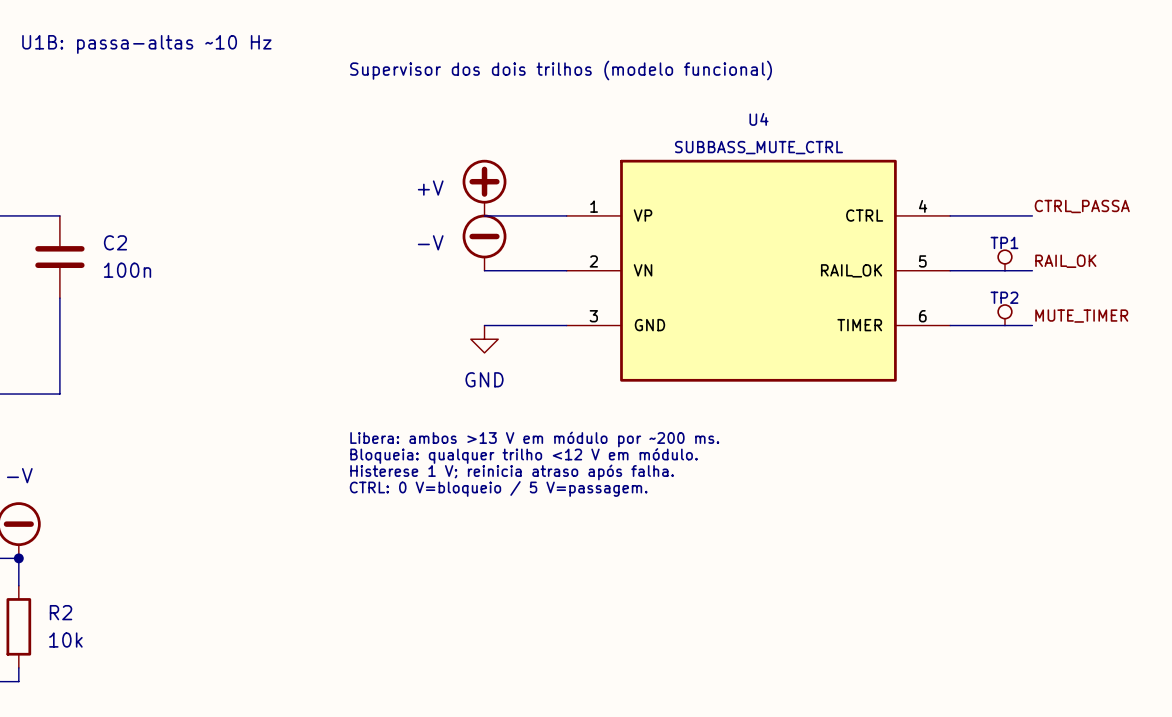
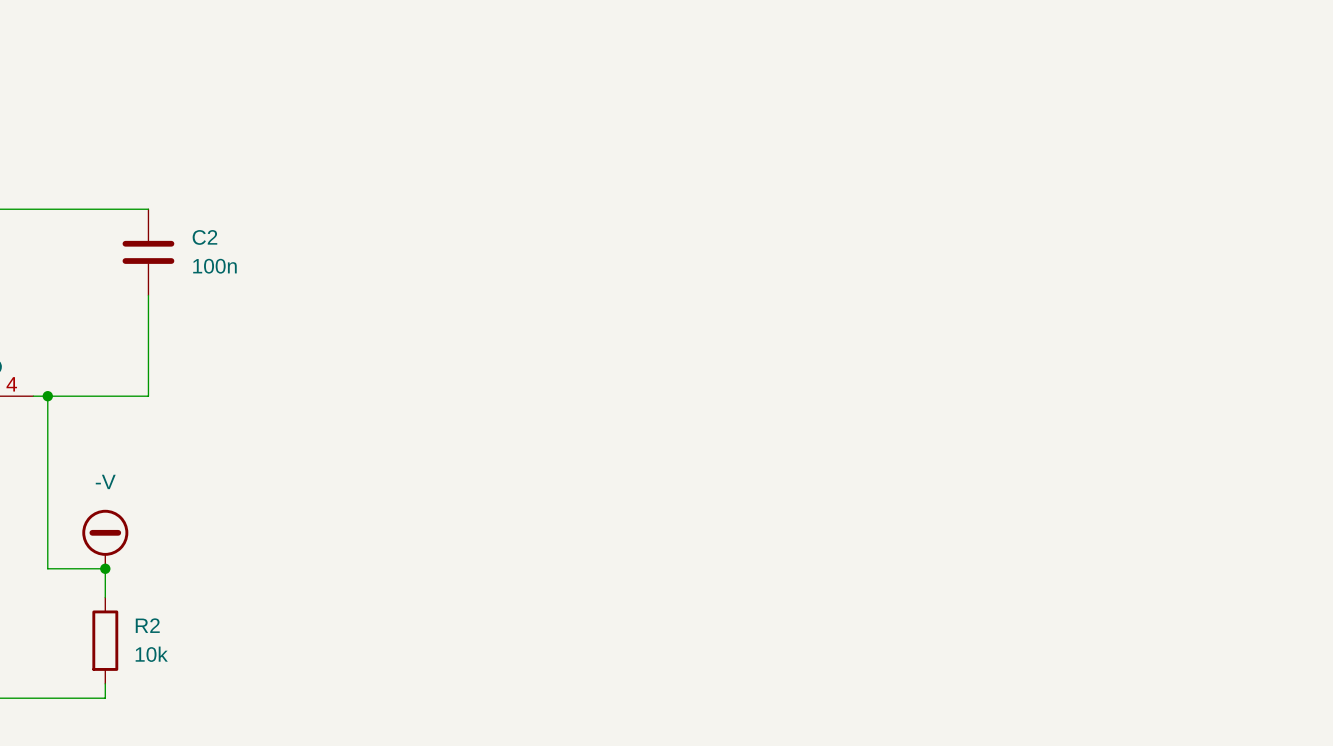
text: U1B: passa-altas ~10 Hz (146, 44) -> none
text: Supervisor dos dois trilhos (modelo funcional) (561, 70) -> none
power symbol: +V (484, 187) -> none
label: CTRL_PASSA (1082, 206) -> none
wire: (484, 215) (566, 215) -> none
wire: (950, 215) (1032, 215) -> none
power symbol: -V (484, 242) -> none
TP1: (1004, 260) -> none
label: RAIL_OK (1065, 261) -> none
wire: (484, 270) (566, 270) -> none
U4: SUBBASS_MUTE_CTRL (758, 270) -> none
wire: (950, 270) (1032, 270) -> none
TP2: (1004, 314) -> none
label: MUTE_TIMER (1081, 316) -> none
wire: (484, 325) (566, 325) -> none
wire: (950, 325) (1032, 325) -> none
power symbol: GND (484, 339) -> none
text: Libera: ambos >13 V em módulo por ~200 ms. (534, 439) -> none
text: Bloqueia: qualquer trilho <12 V em módulo. (524, 455) -> none
text: Histerese 1 V; reinicia atraso após falha. (512, 472) -> none
text: CTRL: 0 V=bloqueio / 5 V=passagem. (498, 488) -> none

